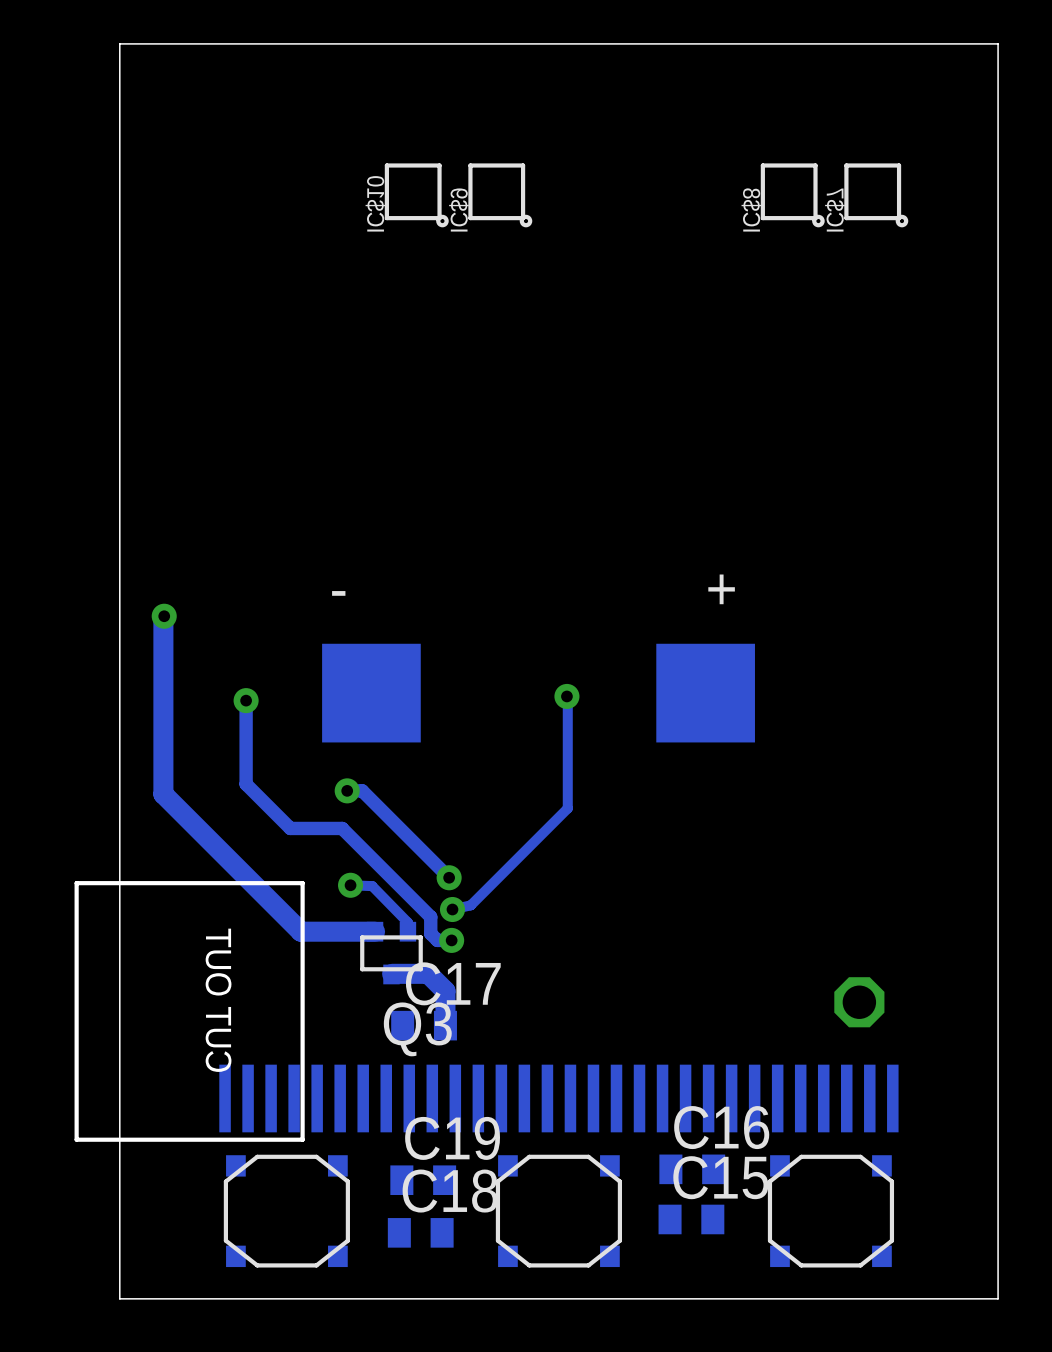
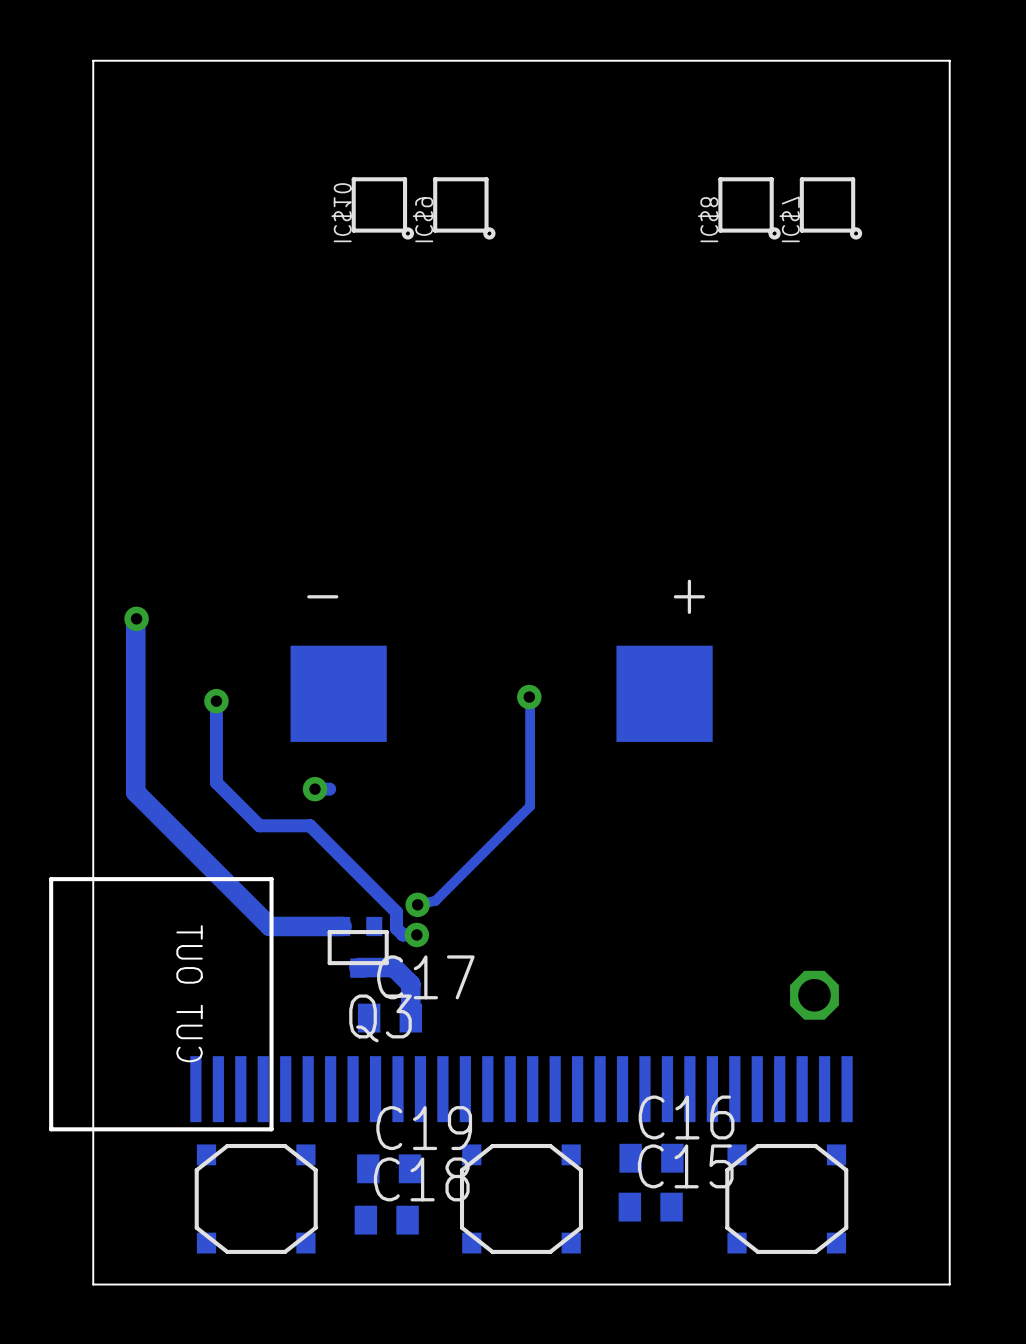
track: (362, 790) (449, 877) -> none
via: (449, 877) -> none
track: (350, 885) (372, 886) (407, 922) (407, 931) -> none
via: (350, 885) -> none

